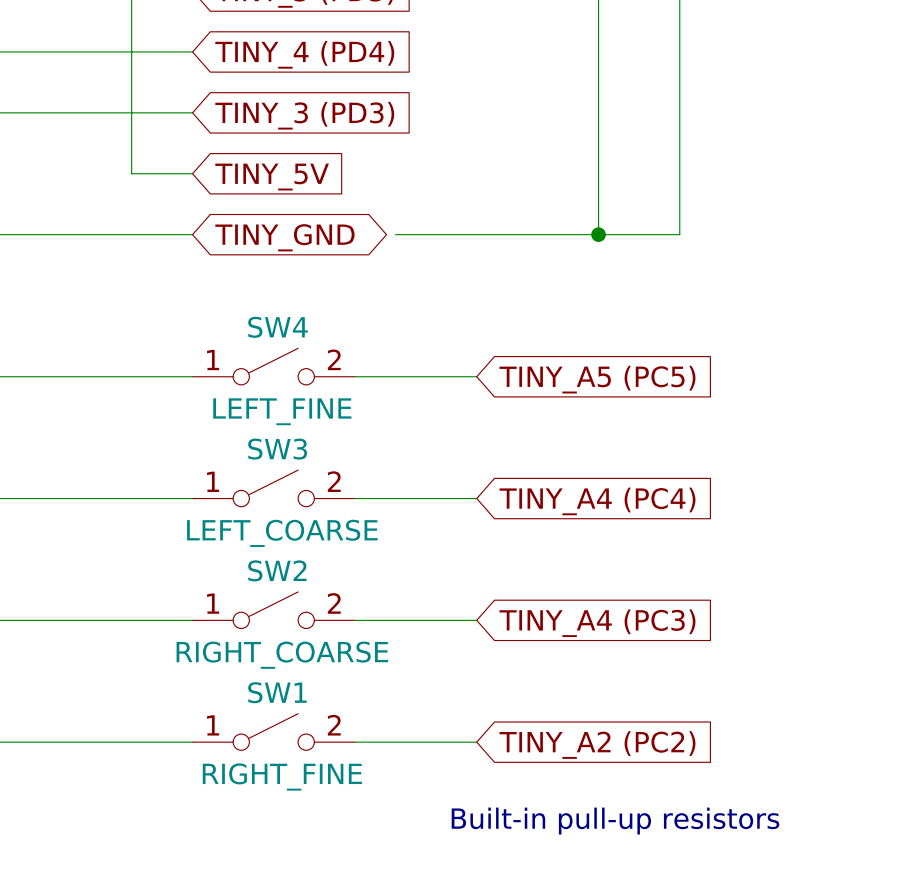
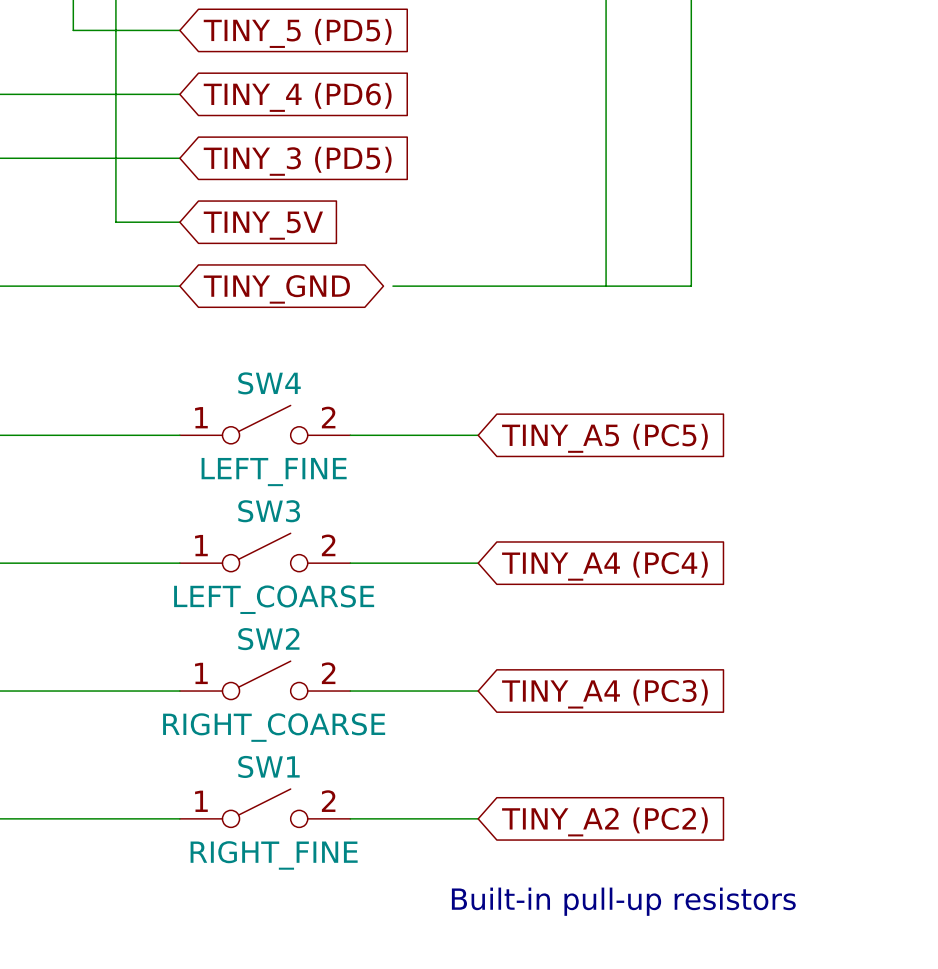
global label: TINY_4 (PD4) (304, 54) -> TINY_4 (PD6) (297, 97)
global label: TINY_3 (PD3) (304, 115) -> TINY_3 (PD5) (297, 161)
junction: (598, 234) -> none

